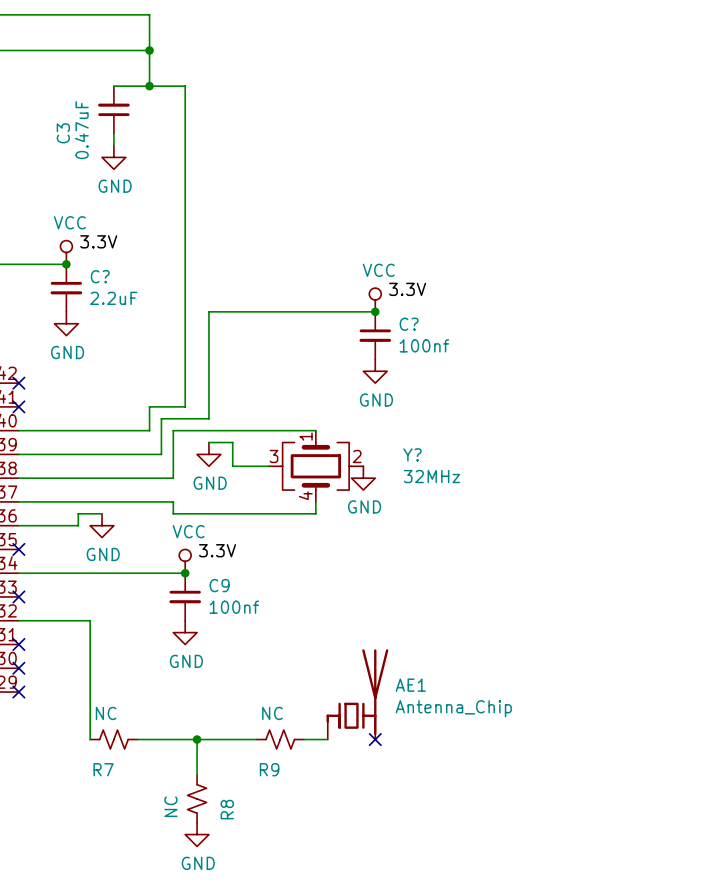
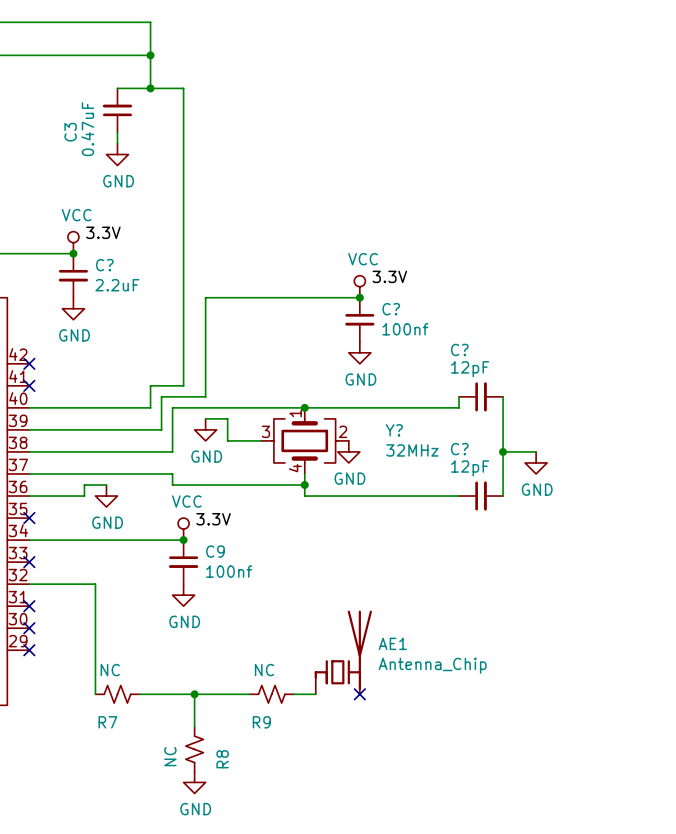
wire: none -> (458, 396) (458, 407) (304, 407)
C?: none -> 12pF (481, 396)
wire: none -> (503, 396) (503, 496)
junction: none -> (304, 407)
wire: none -> (503, 451) (536, 451)
junction: none -> (503, 451)
power symbol: none -> GND (536, 462)
wire: none -> (304, 485) (304, 496) (458, 496)
junction: none -> (304, 485)
C?: none -> 12pF (481, 496)

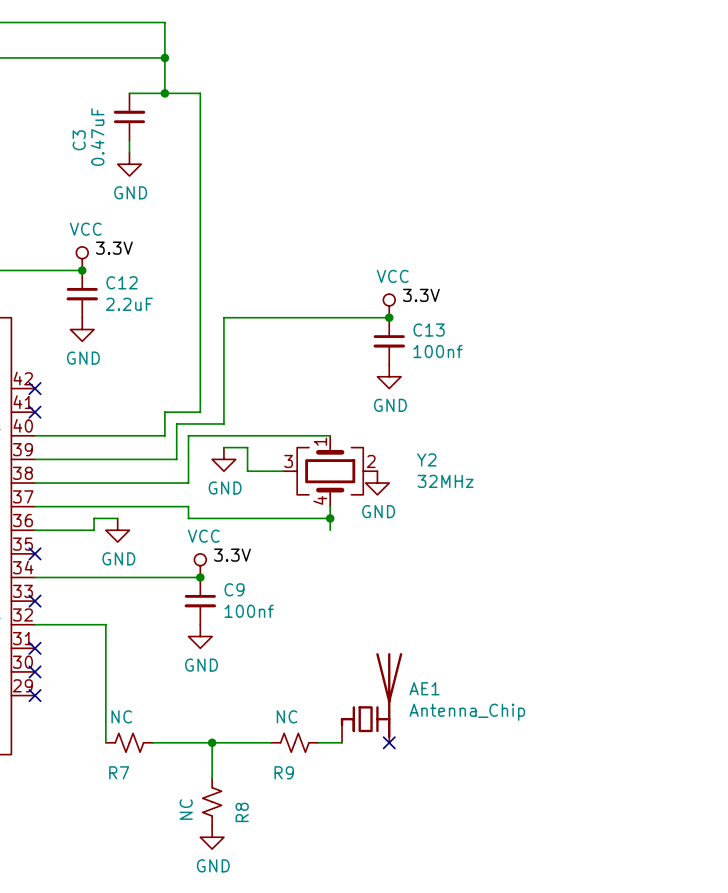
C? name: C? (104, 265) -> C12 (122, 282)
C? name: C? (391, 309) -> C13 (429, 330)
wire: (458, 396) (458, 407) (304, 407) -> none
C?: 12pF (481, 396) -> none
wire: (503, 396) (503, 496) -> none
junction: (304, 407) -> none
Y? name: Y? (394, 430) -> Y2 (426, 459)
wire: (503, 451) (536, 451) -> none
junction: (503, 451) -> none
power symbol: GND (536, 462) -> none
wire: (304, 496) (458, 496) -> none
C?: 12pF (481, 496) -> none

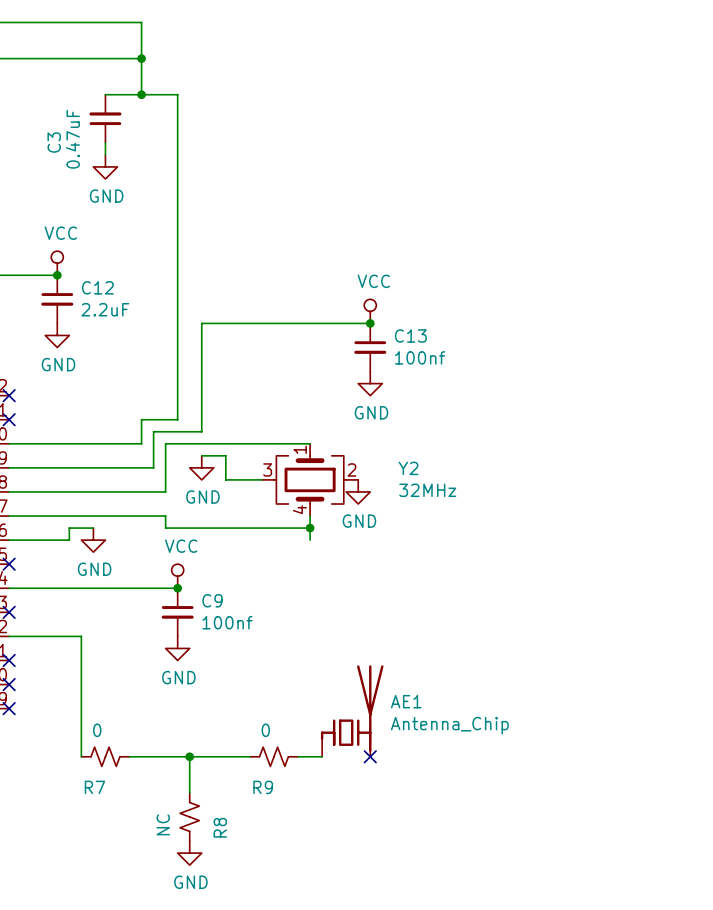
label: 3.3V (114, 248) -> none
label: 3.3V (421, 295) -> none
label: 3.3V (232, 555) -> none
R7 value: NC (121, 716) -> 0 (97, 730)
R9 value: NC (287, 716) -> 0 (265, 730)

